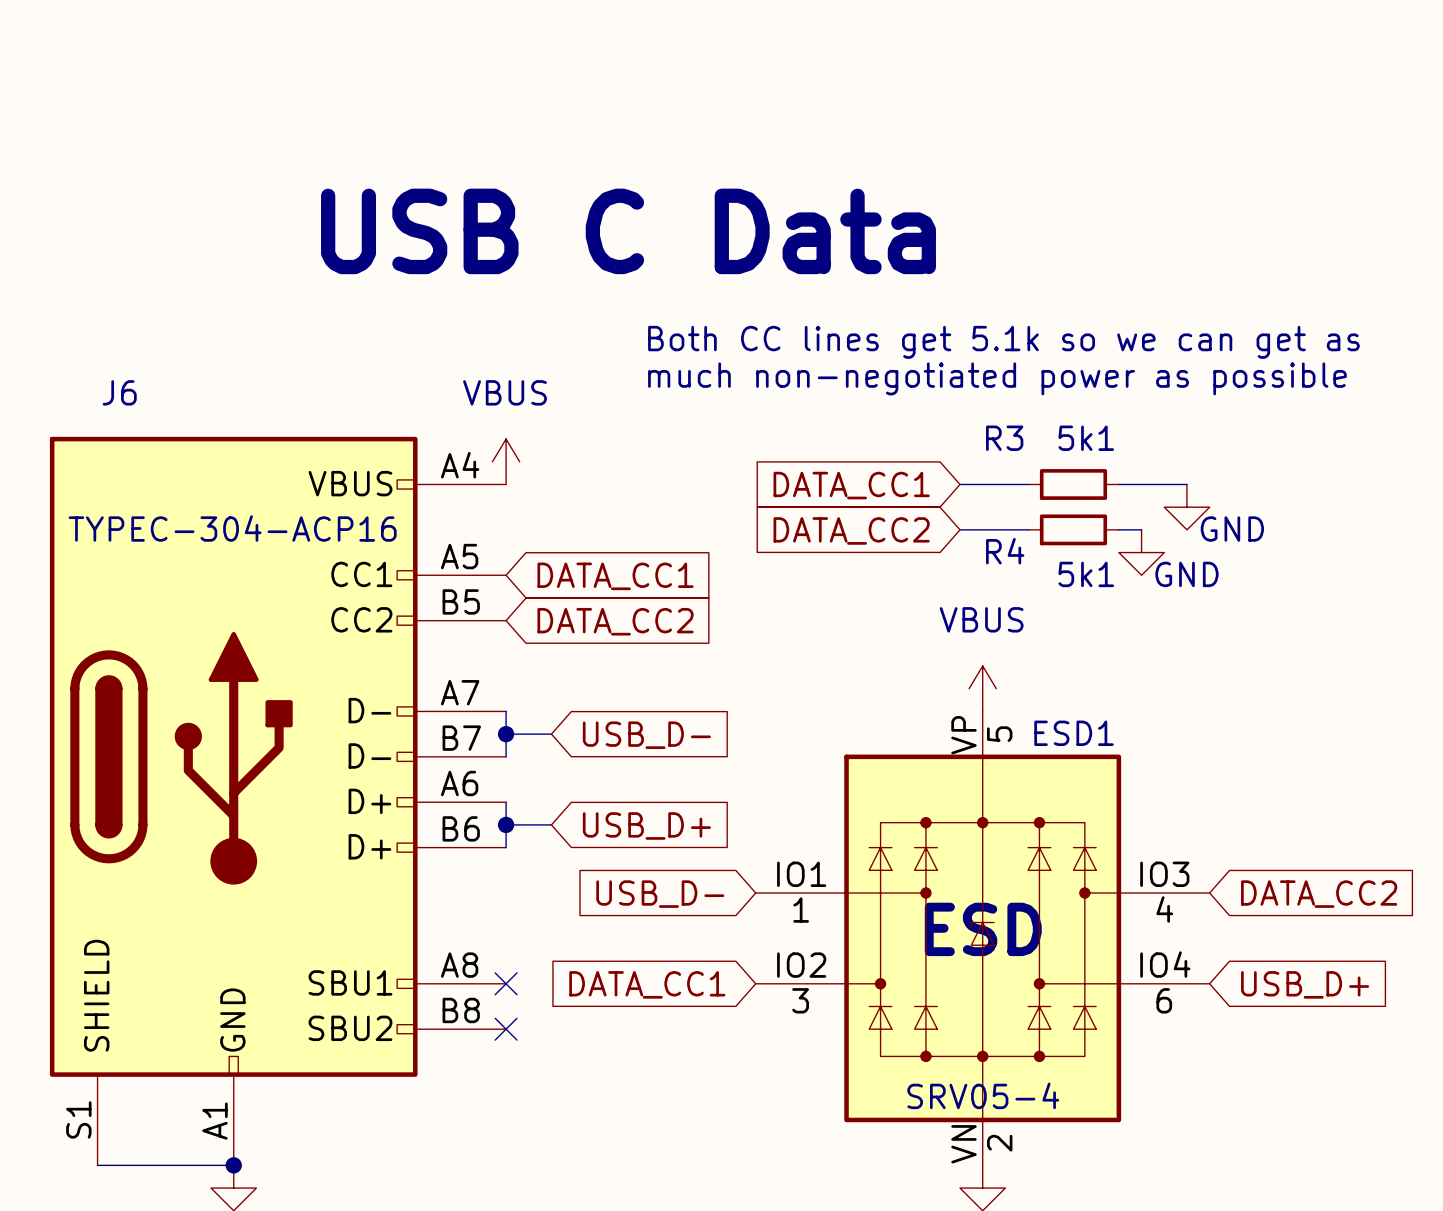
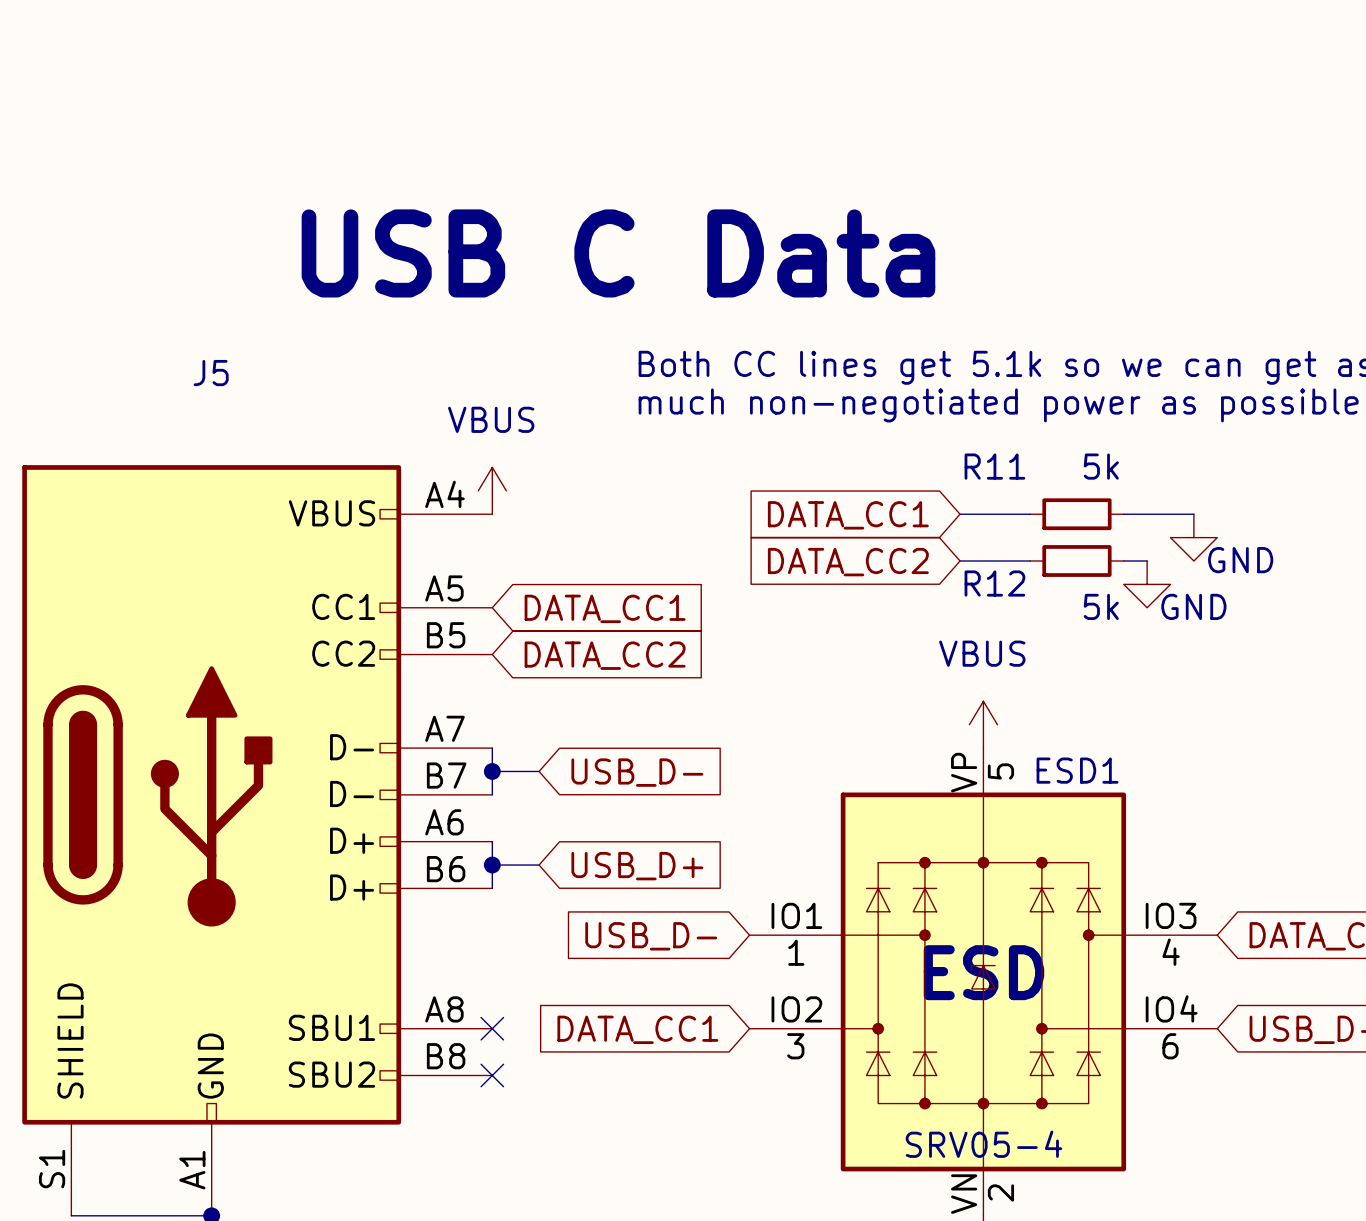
J6 name: J6 (119, 392) -> J5 (211, 373)
R3 name: R3 (1004, 438) -> R11 (994, 466)
R3 value: 5k1 (1086, 438) -> 5k (1101, 466)
J6 text: TYPEC-304-ACP16 (232, 528) -> none
R4 name: R4 (1005, 551) -> R12 (994, 583)
R4 value: 5k1 (1086, 574) -> 5k (1101, 606)

